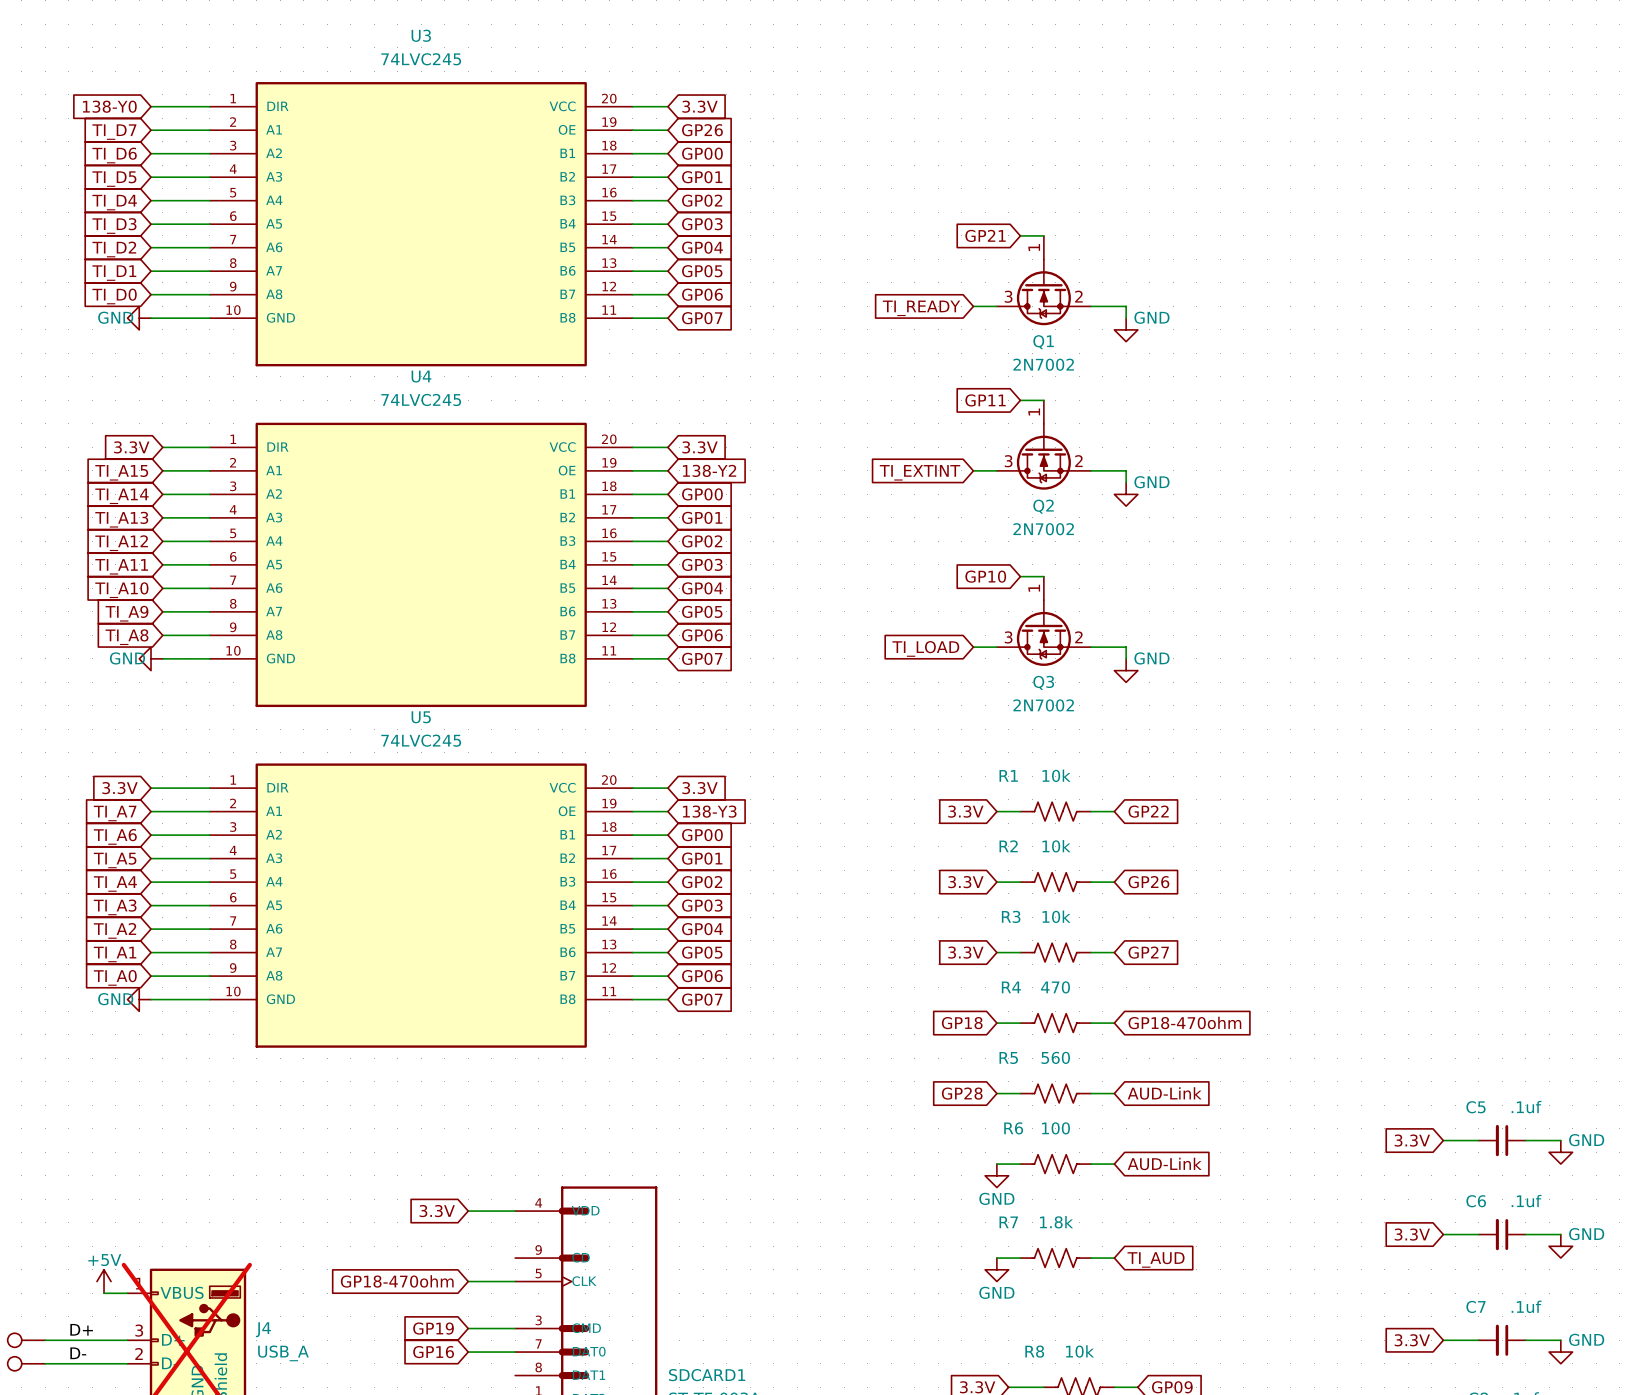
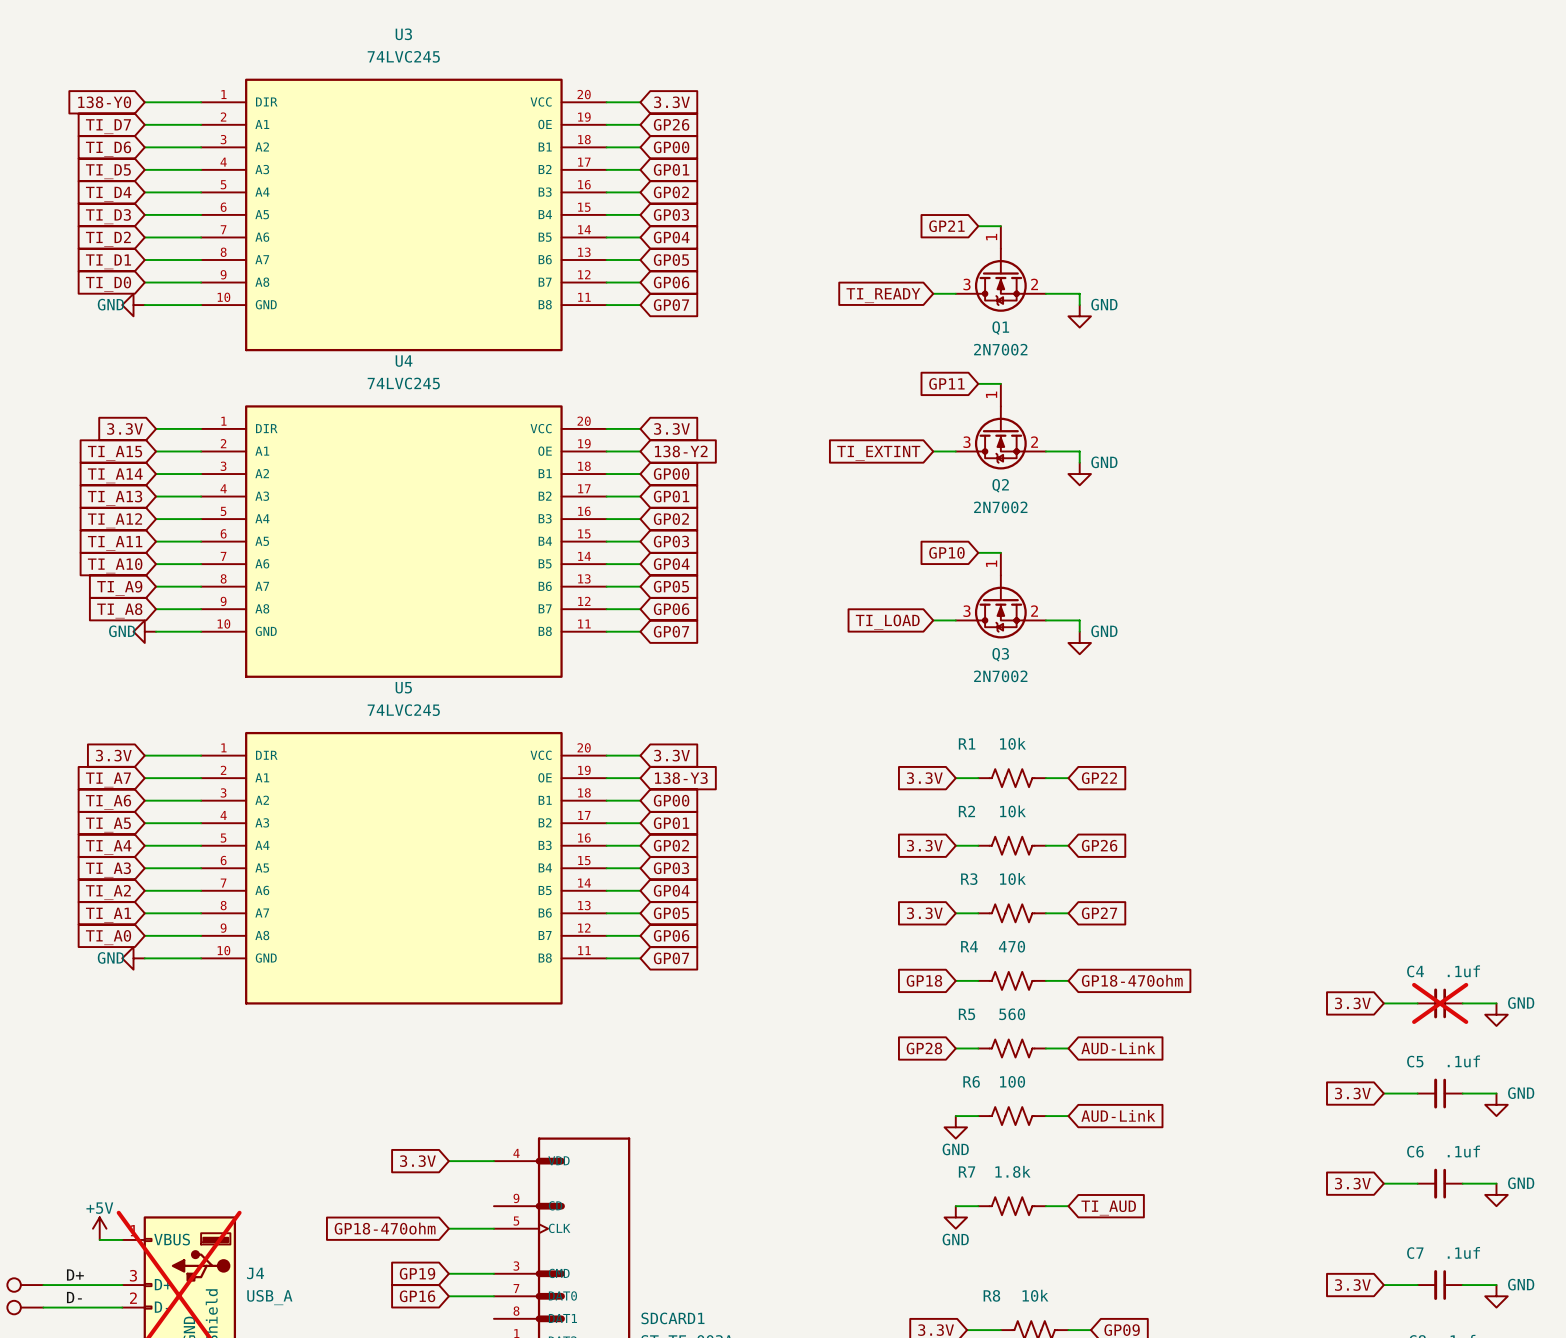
global label: none -> 3.3V (1352, 1003)
wire: none -> (1383, 1003) (1417, 1003)
C4: none -> .1uf (1440, 1003)
wire: none -> (1462, 1003) (1496, 1003)
power symbol: none -> GND (1496, 1014)

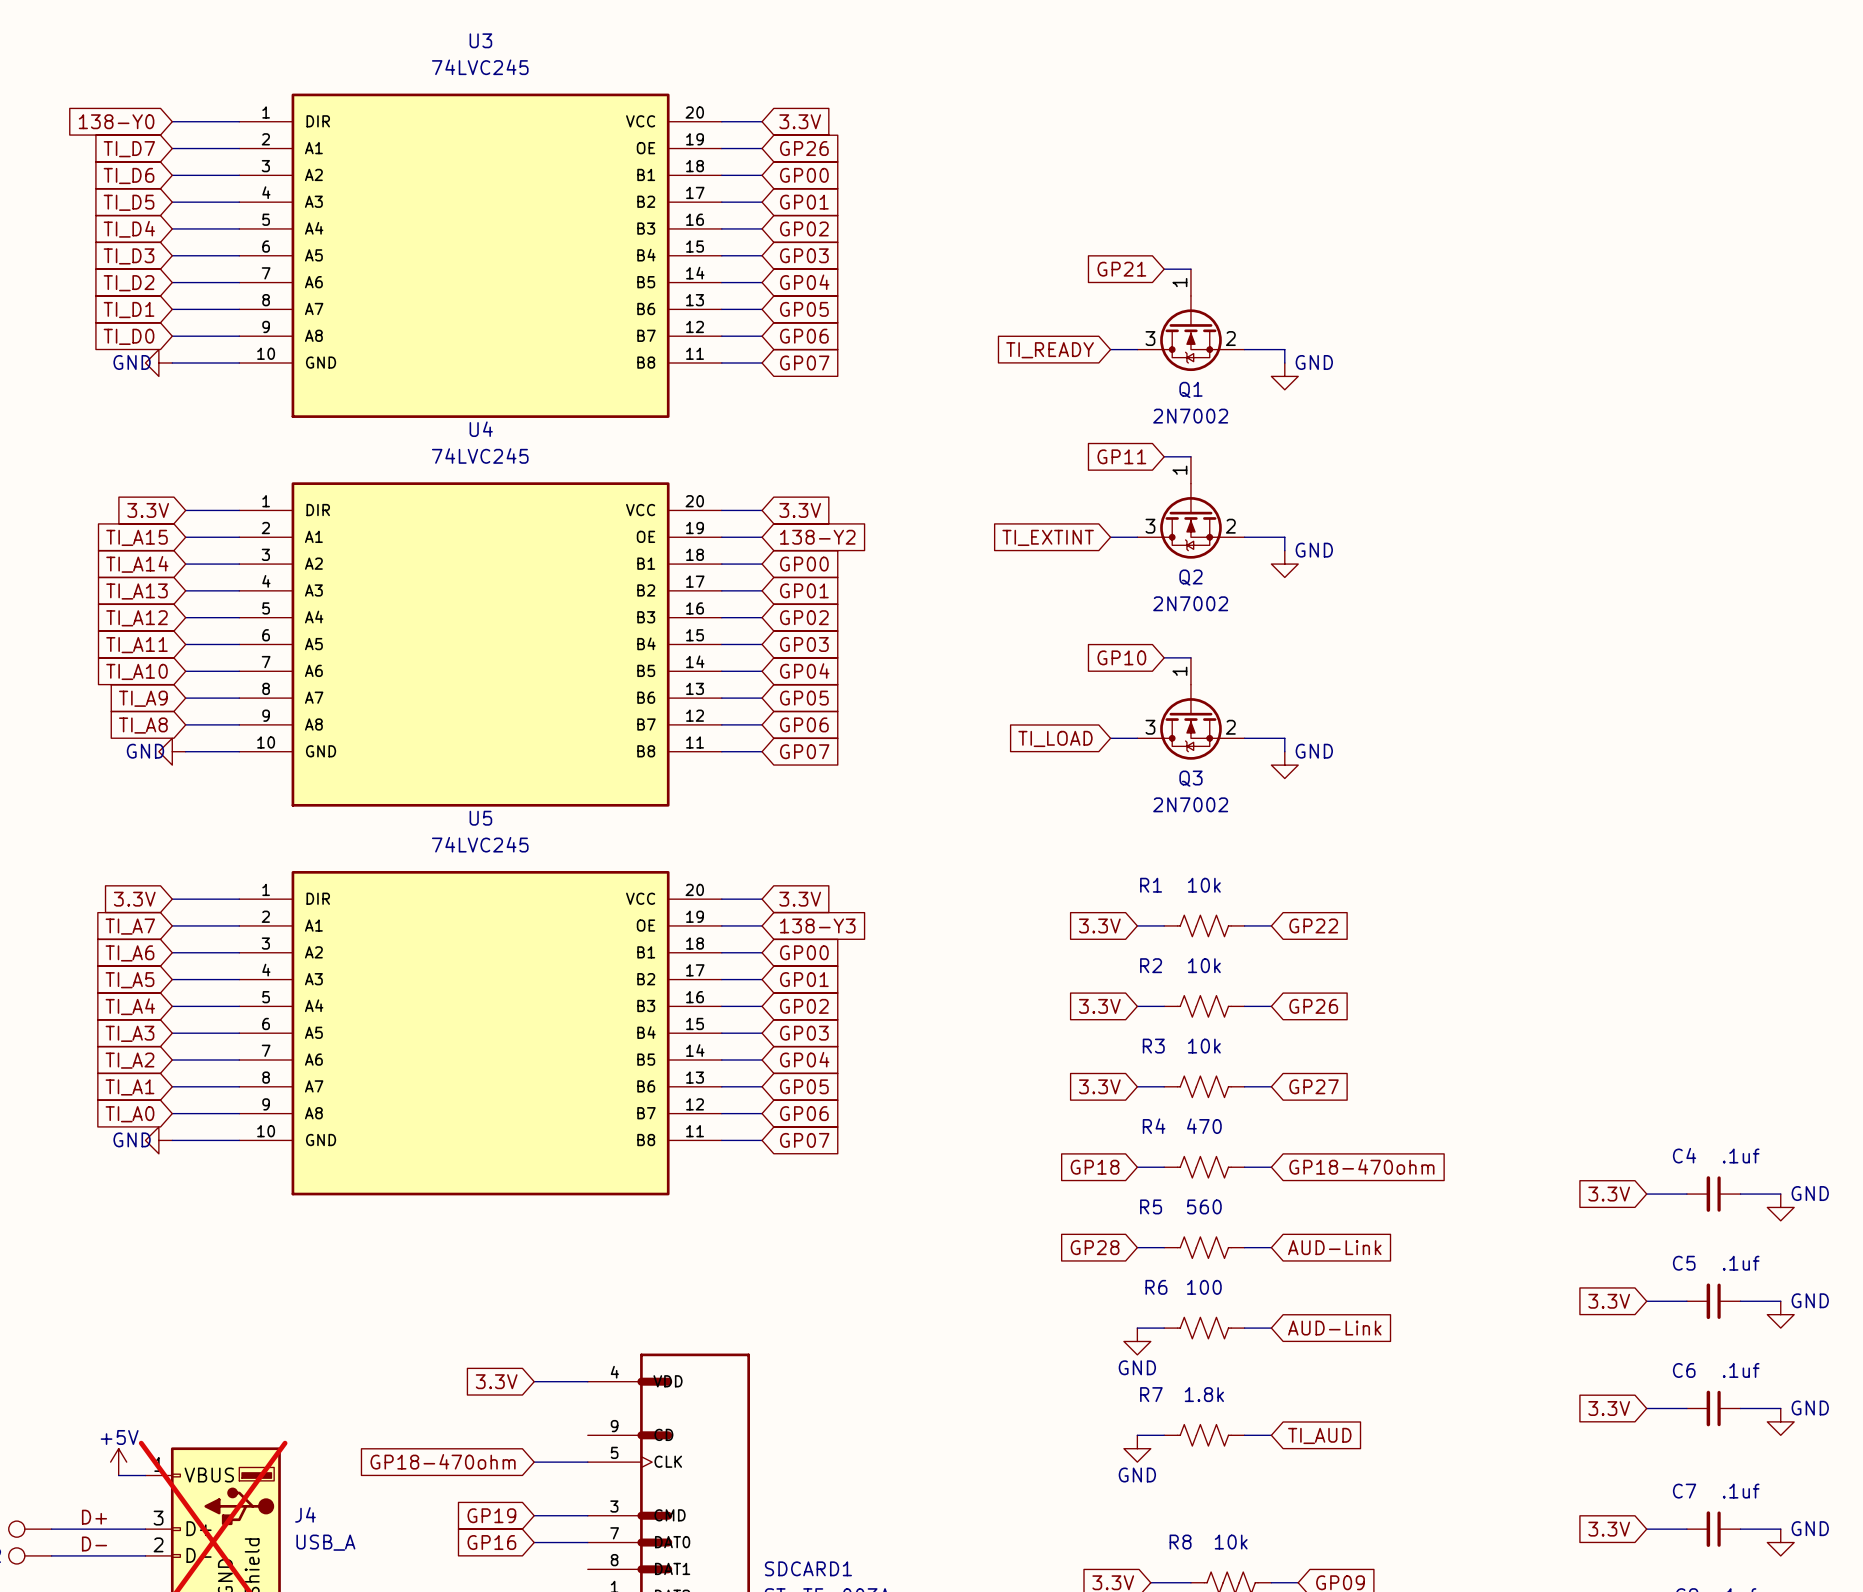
C4 do-not-place cross: (1440, 1003) -> none

